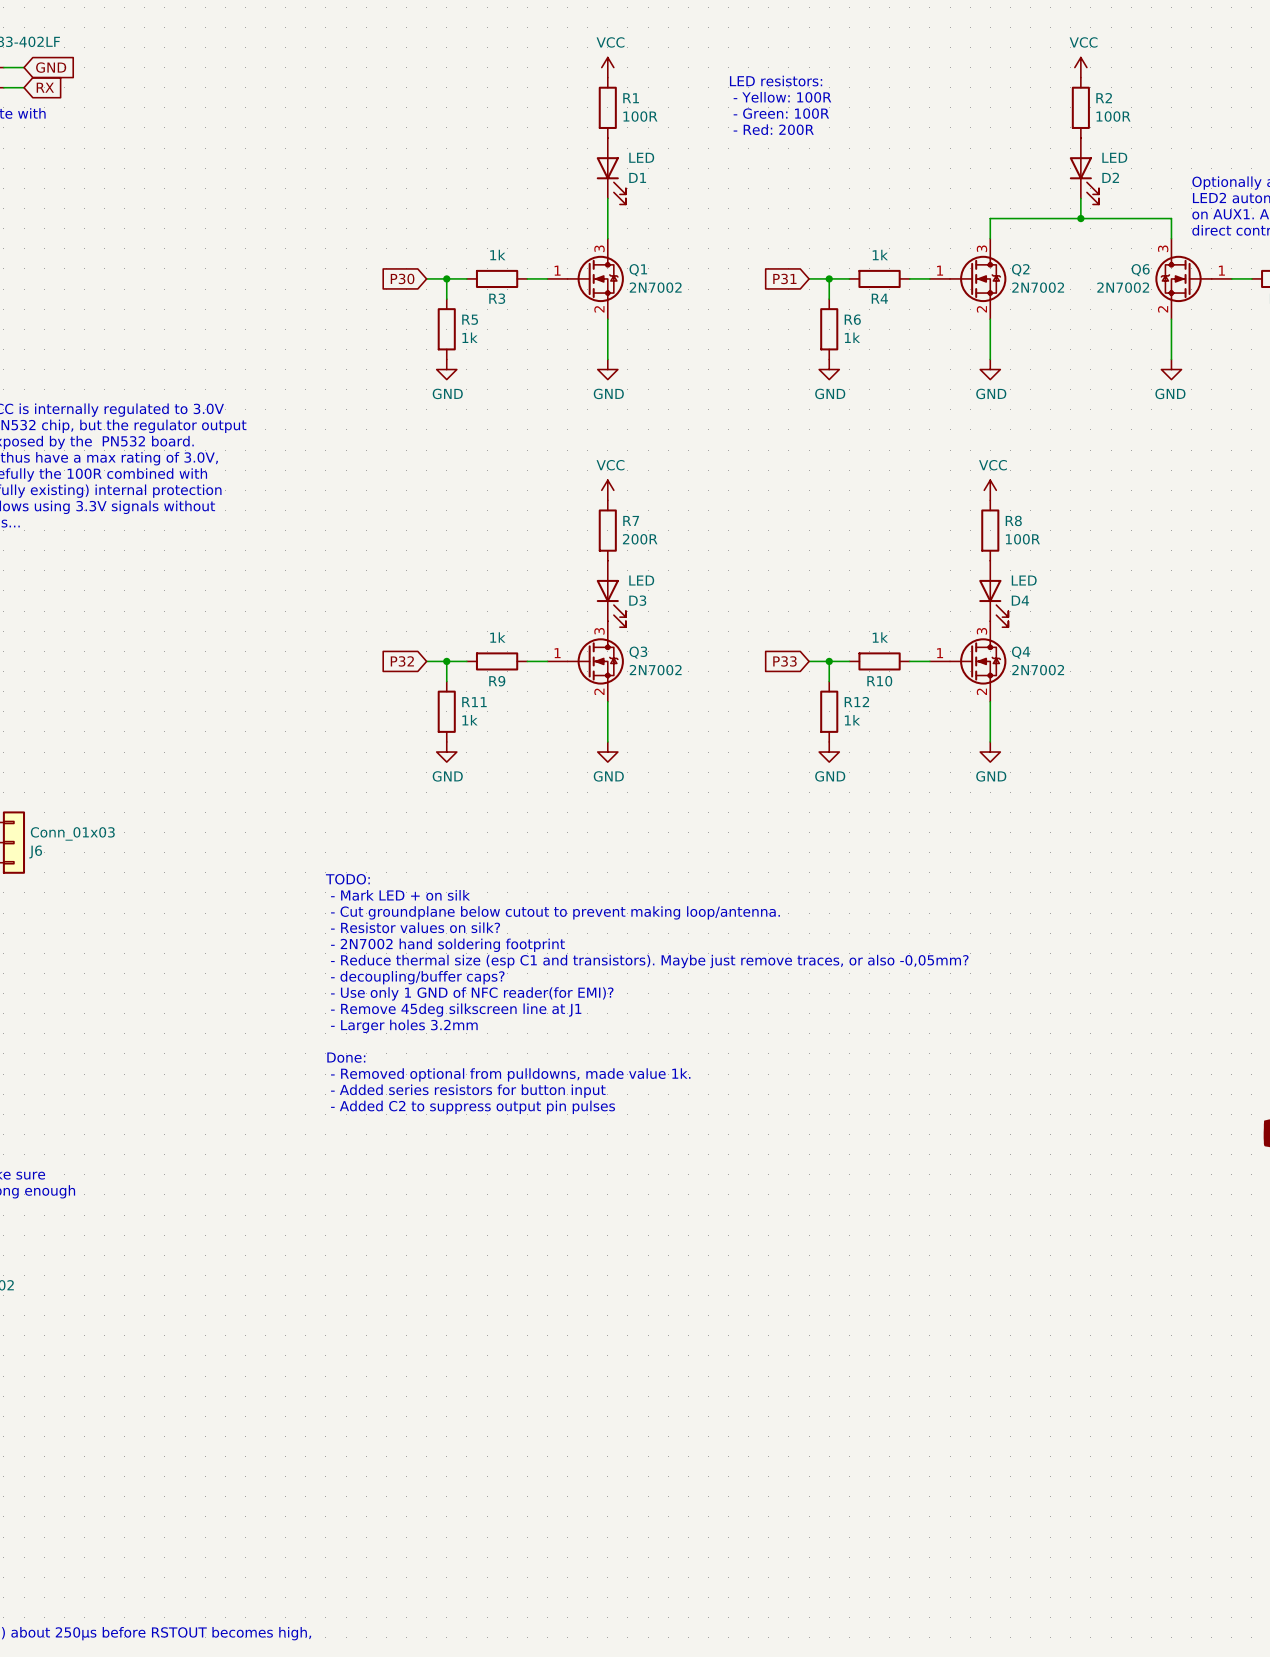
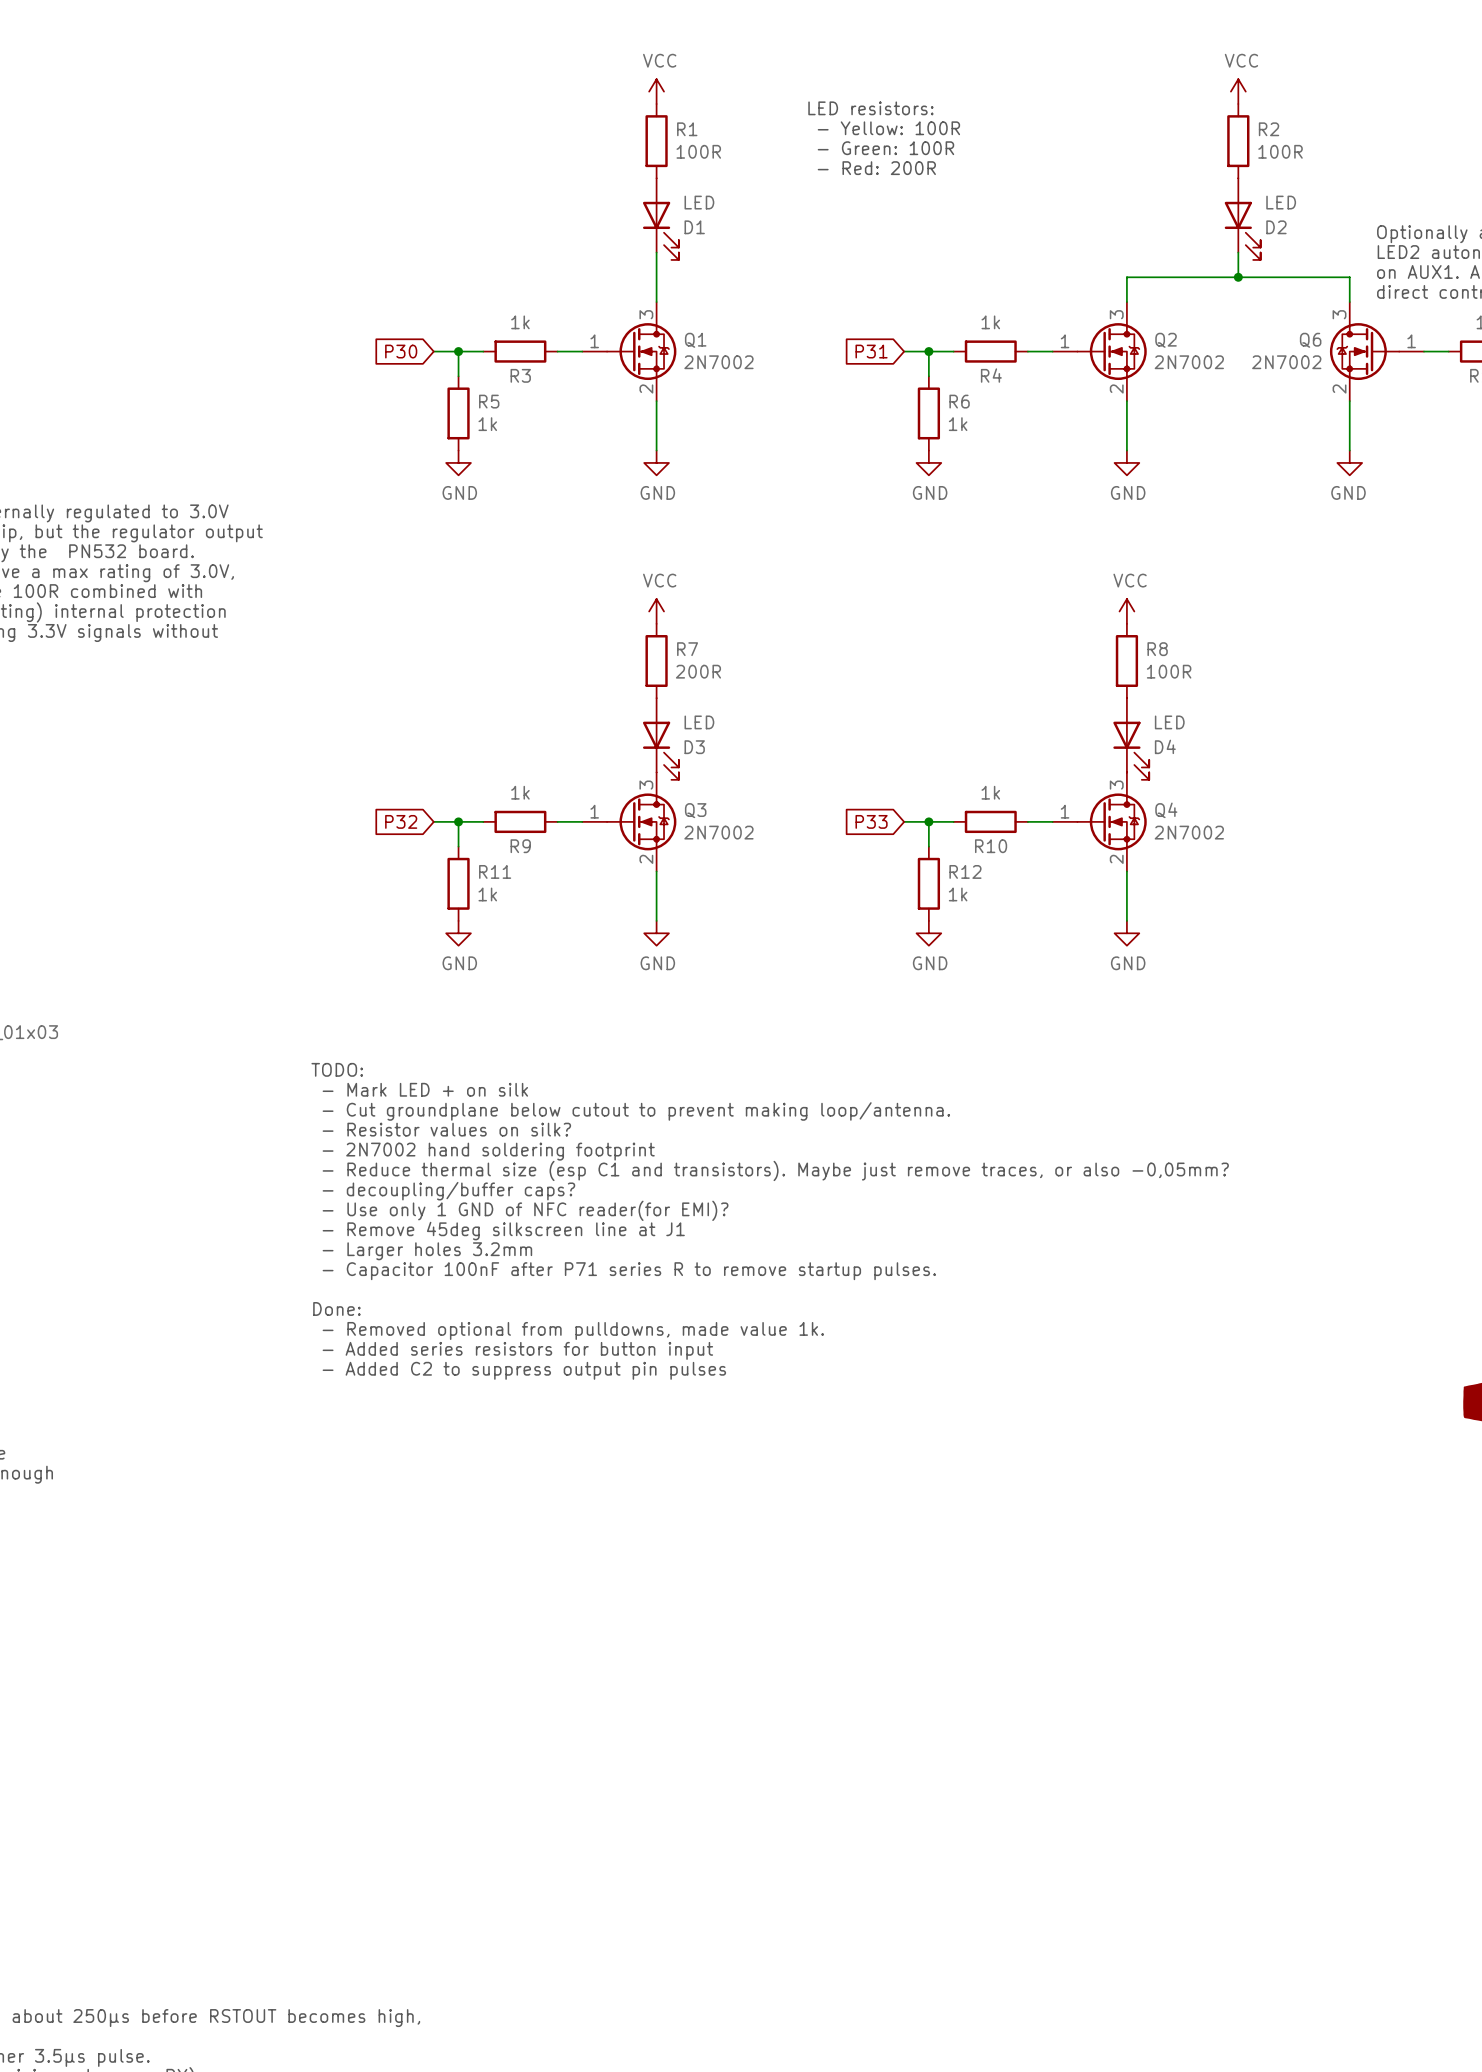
text: none -> TODO: (337, 1069)
text: TODO: (347, 879) -> - Mark LED + on silk (425, 1089)
text: - Mark LED + on silk (400, 895) -> - Cut groundplane below cutout to prevent making loop/antenna. (636, 1111)
text: - Cut groundplane below cutout to prevent making loop/antenna. (555, 912) -> - Resistor values on silk? (446, 1129)
text: - Resistor values on silk? (415, 927) -> - 2N7002 hand soldering footprint (488, 1151)
text: - 2N7002 hand soldering footprint (447, 945) -> - Reduce thermal size (esp C1 and transistors). Maybe just remove traces, or also -0,05mm? (775, 1170)
text: - Reduce thermal size (esp C1 and transistors). Maybe just remove traces, or also -0,05mm? (649, 961) -> - decoupling/buffer caps? (448, 1191)
text: - decoupling/buffer caps? (417, 977) -> - Use only 1 GND of NFC reader(for EMI)? (525, 1210)
text: - Use only 1 GND of NFC reader(for EMI)? (472, 993) -> - Remove 45deg silkscreen line at J1 (503, 1231)
text: - Remove 45deg silkscreen line at J1 (456, 1010) -> - Larger holes 3.2mm (427, 1251)
text: - Larger holes 3.2mm (404, 1026) -> - Capacitor 100nF after P71 series R to remove startup pulses. (629, 1271)

